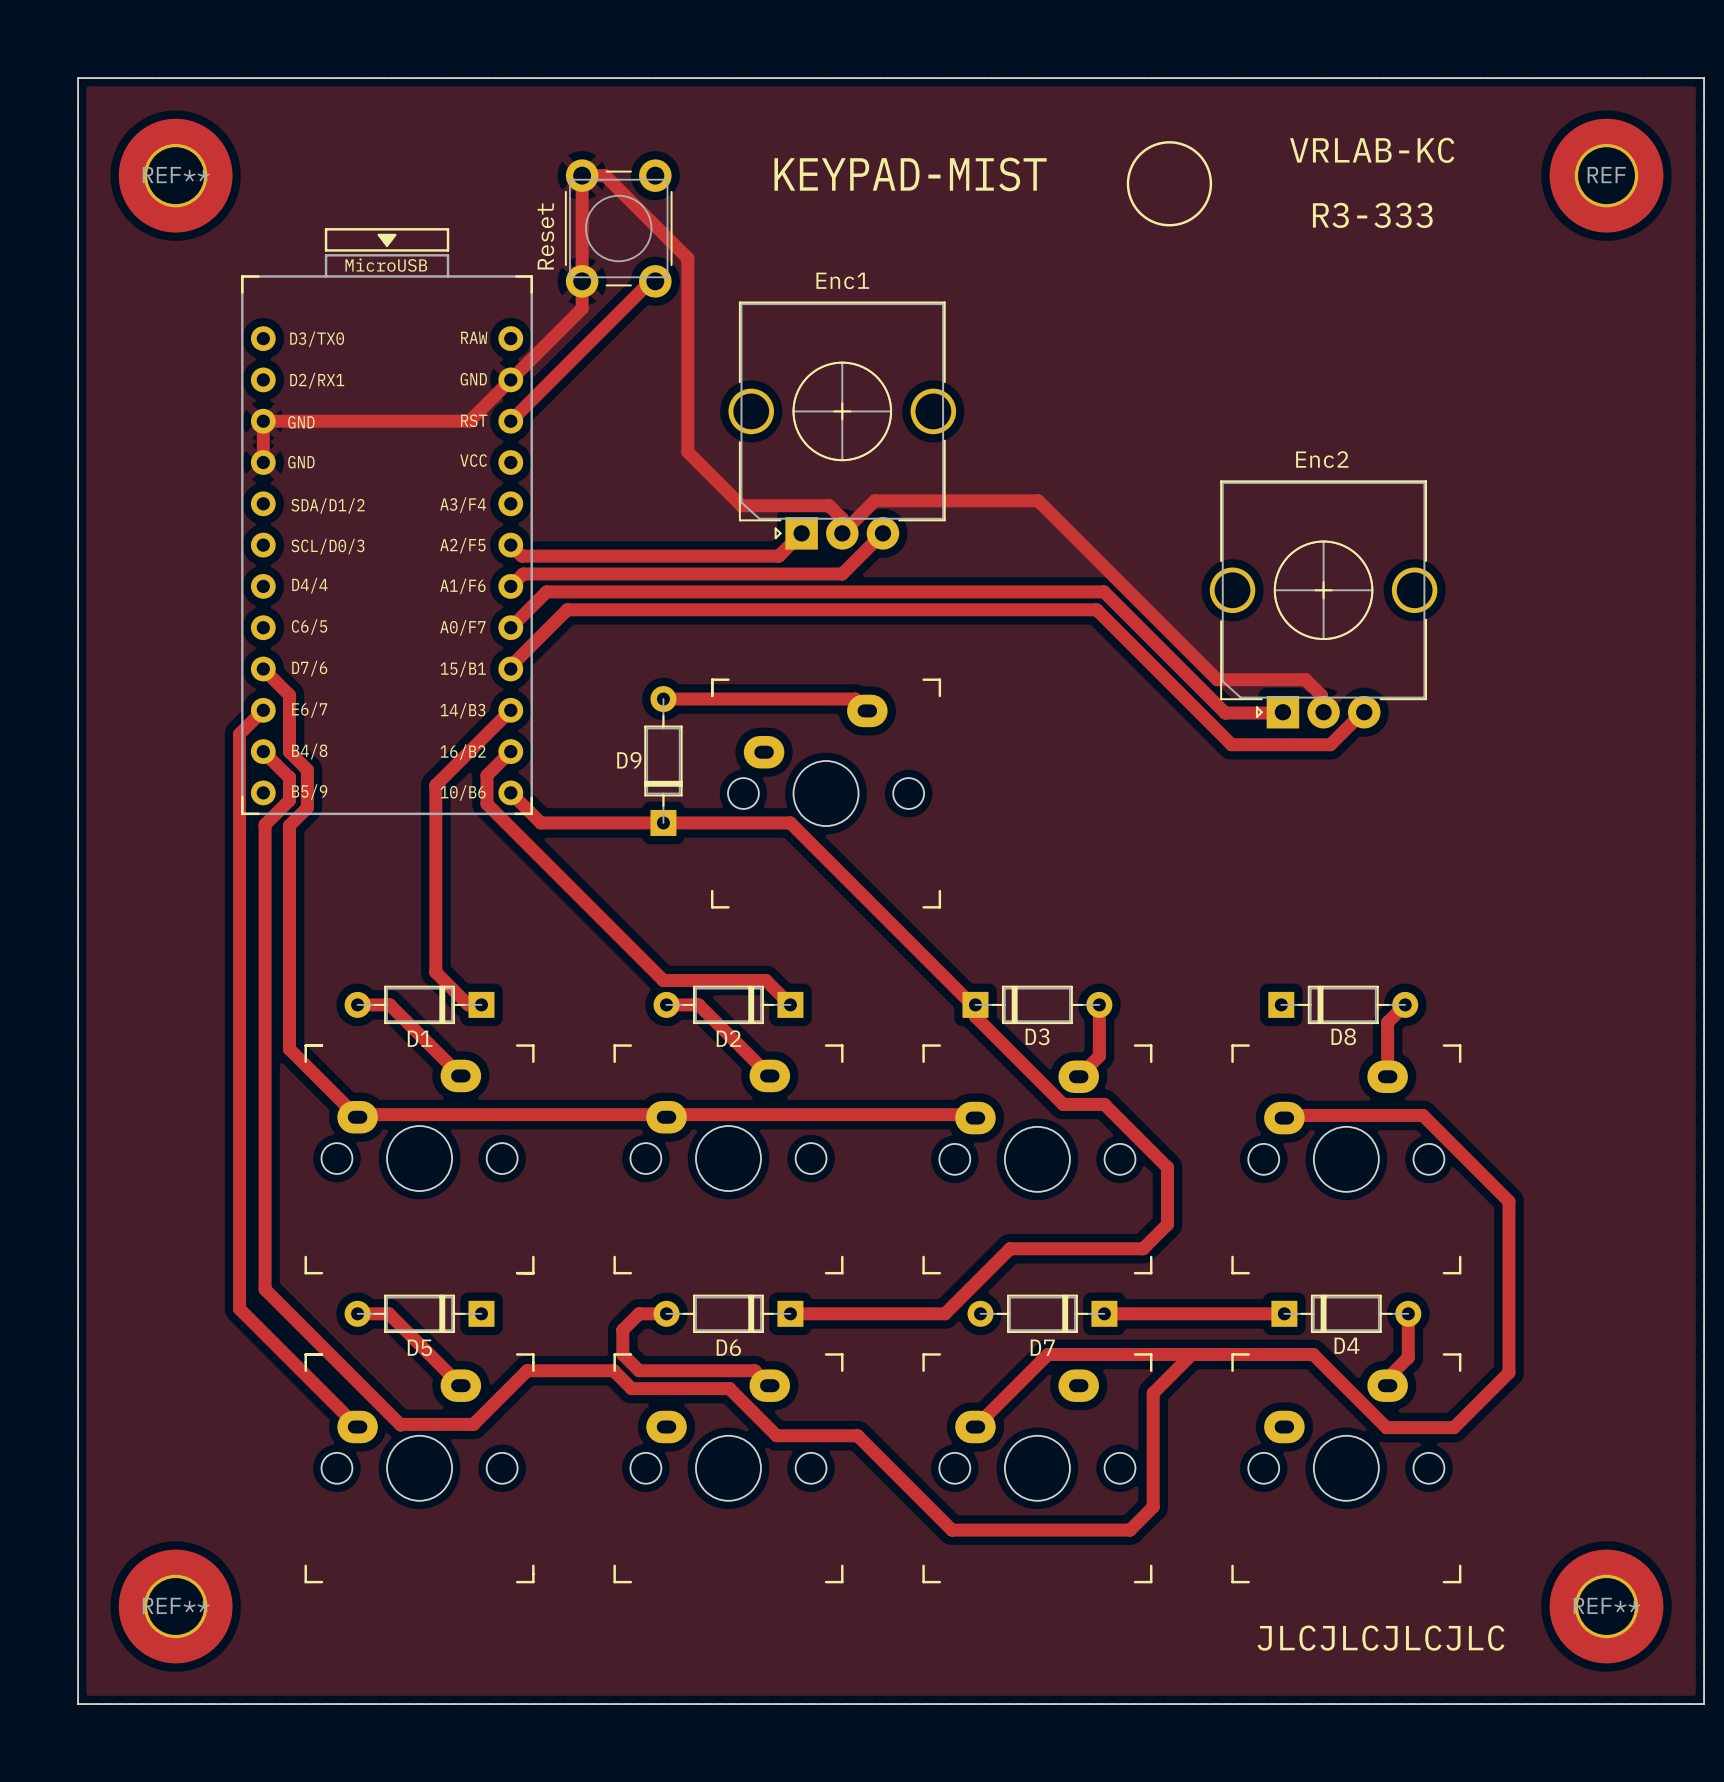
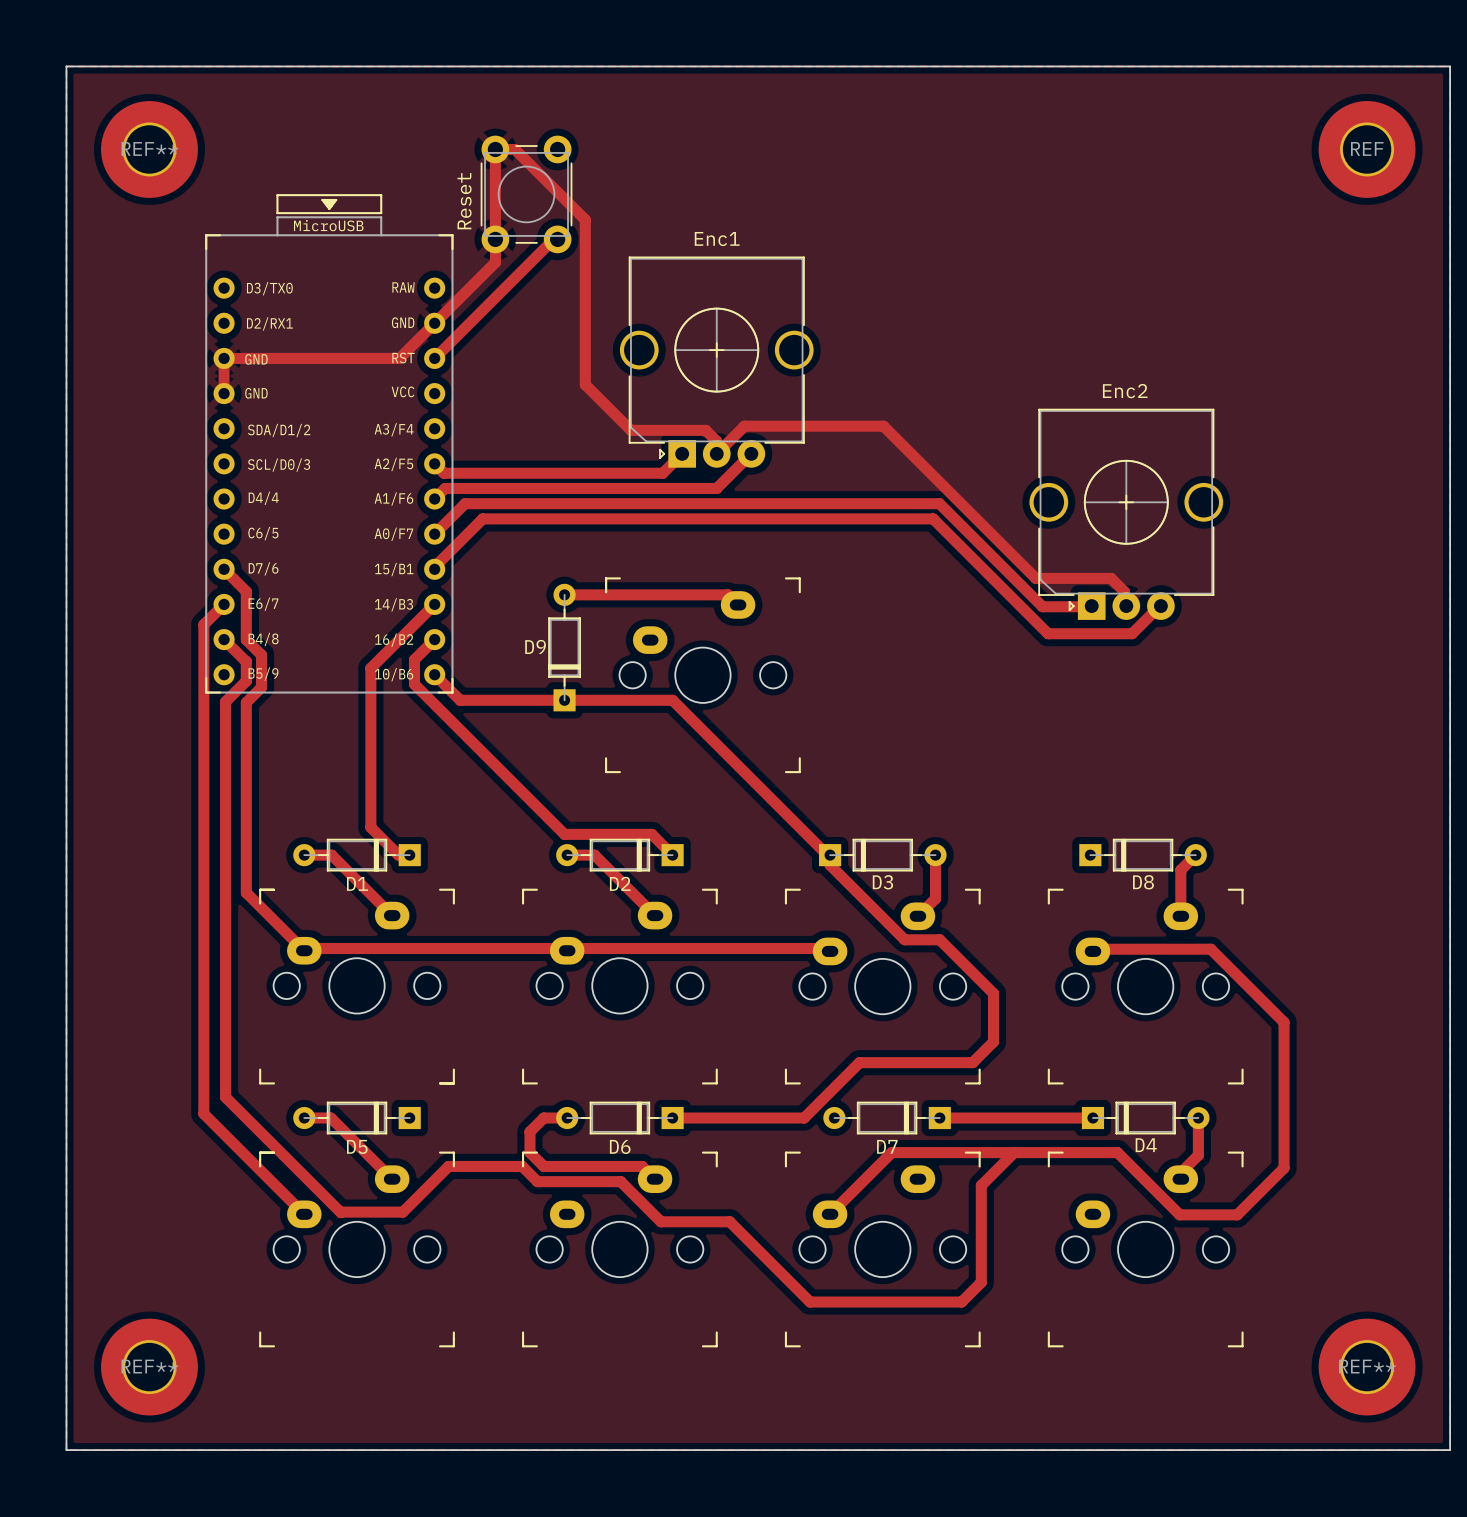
drawing: [1126, 141, 1213, 227] -> none
text: VRLAB-KC (1372, 150) -> none
text: KEYPAD-MIST (910, 174) -> none
text: R3-333 (1372, 215) -> none
text: JLCJLCJLCJLC (1381, 1638) -> none

